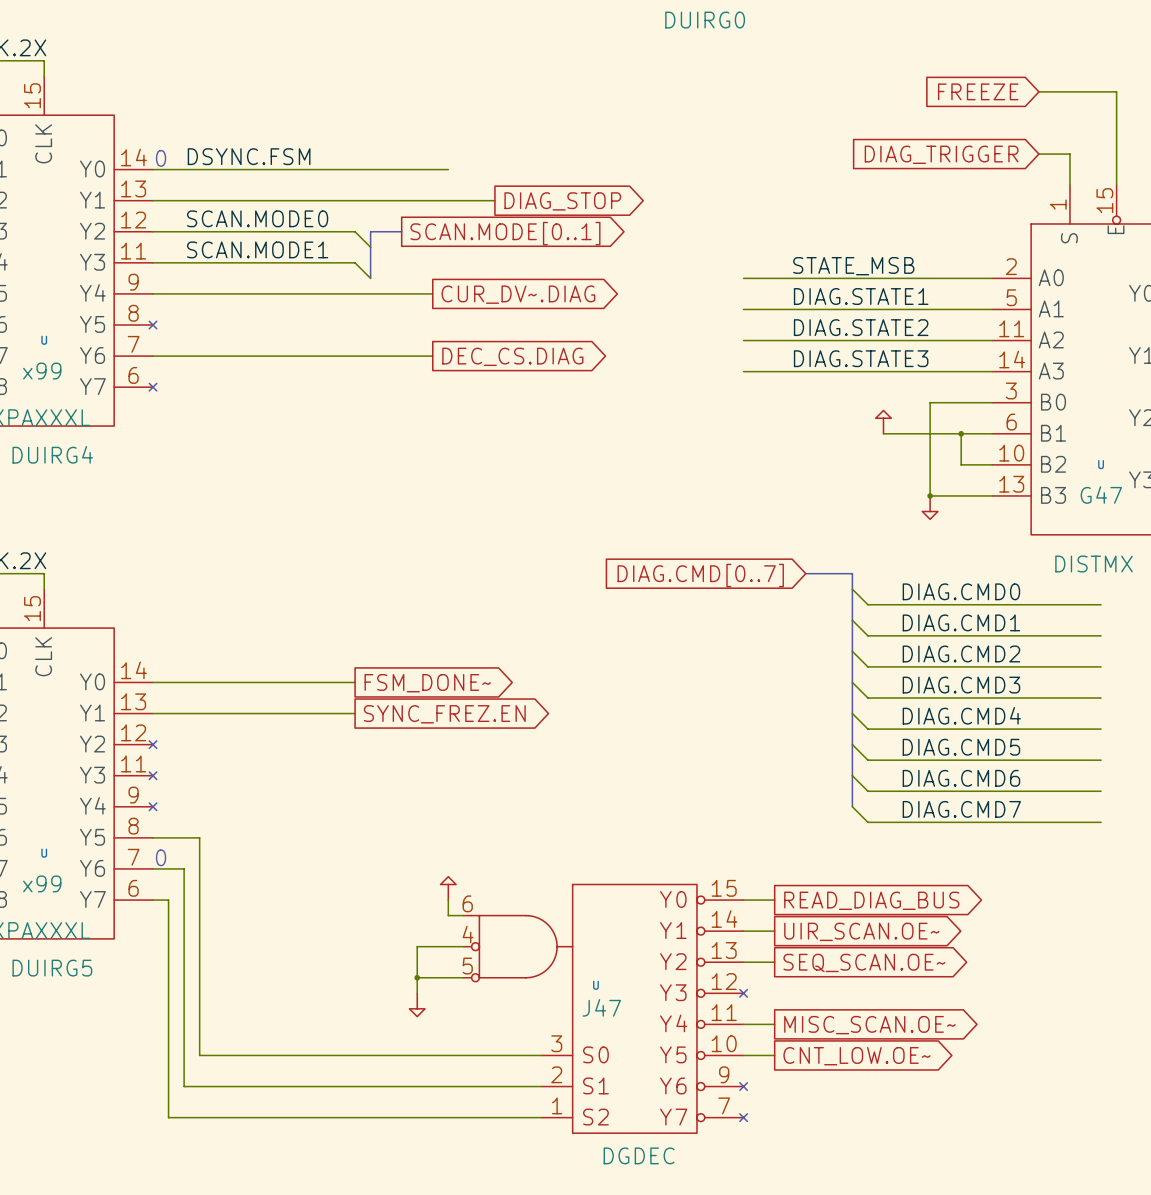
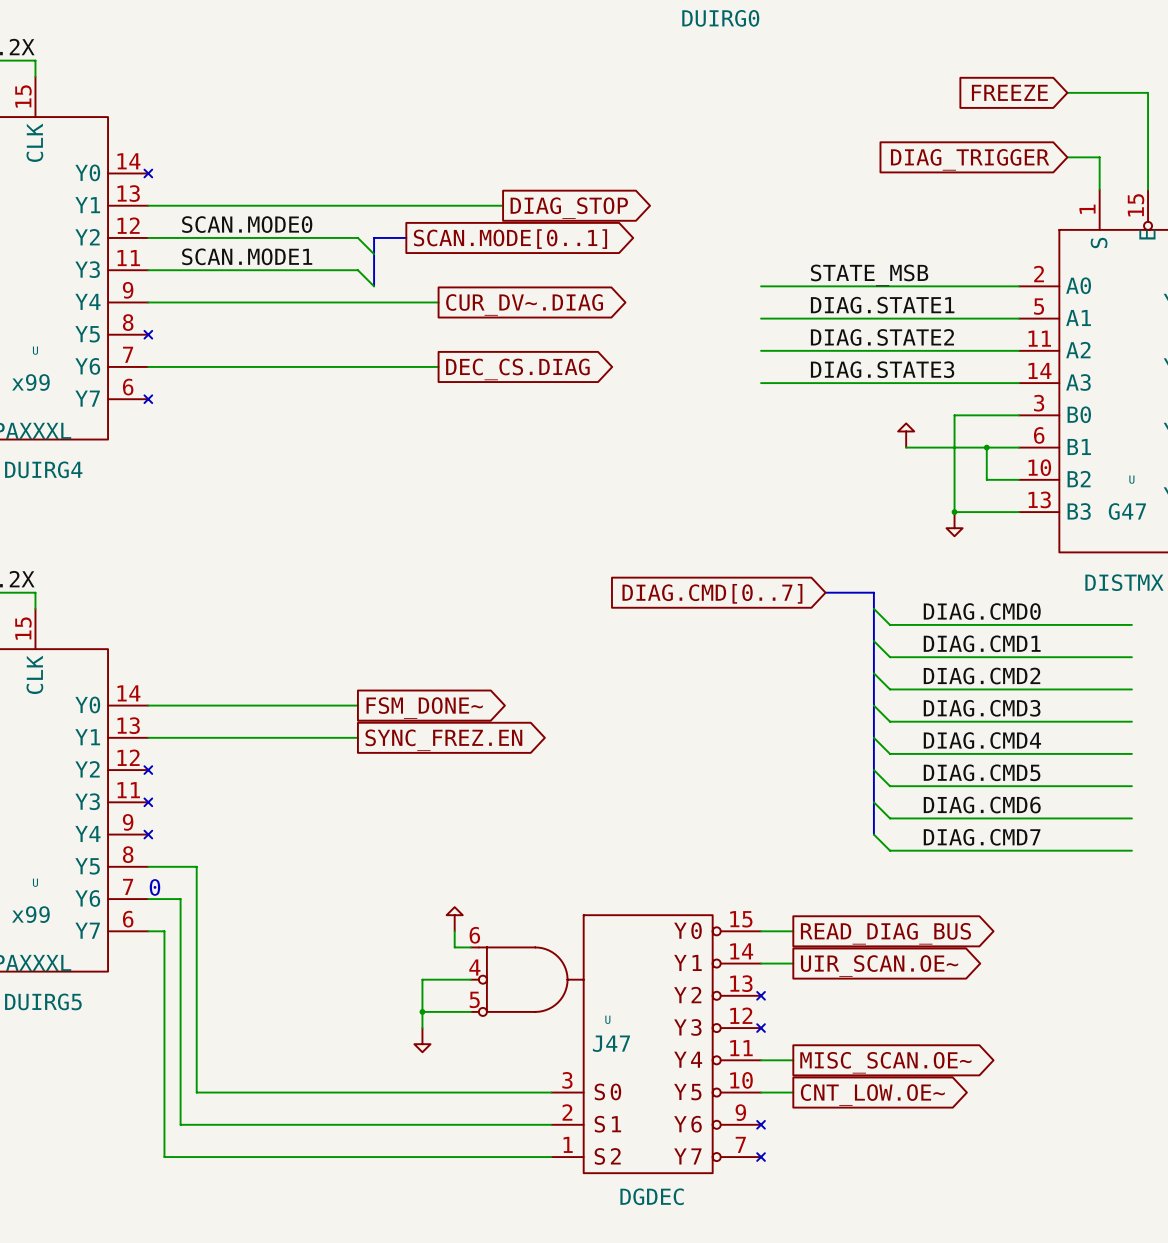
label: DSYNC.FSM (249, 156) -> none
text: 0 (161, 158) -> none
wire: (153, 169) (448, 169) -> none
no-connect mark: none -> (148, 173)
wire: (743, 962) (774, 962) -> none
no-connect mark: none -> (761, 995)
global label: SEQ_SCAN.OE~ (864, 962) -> none

